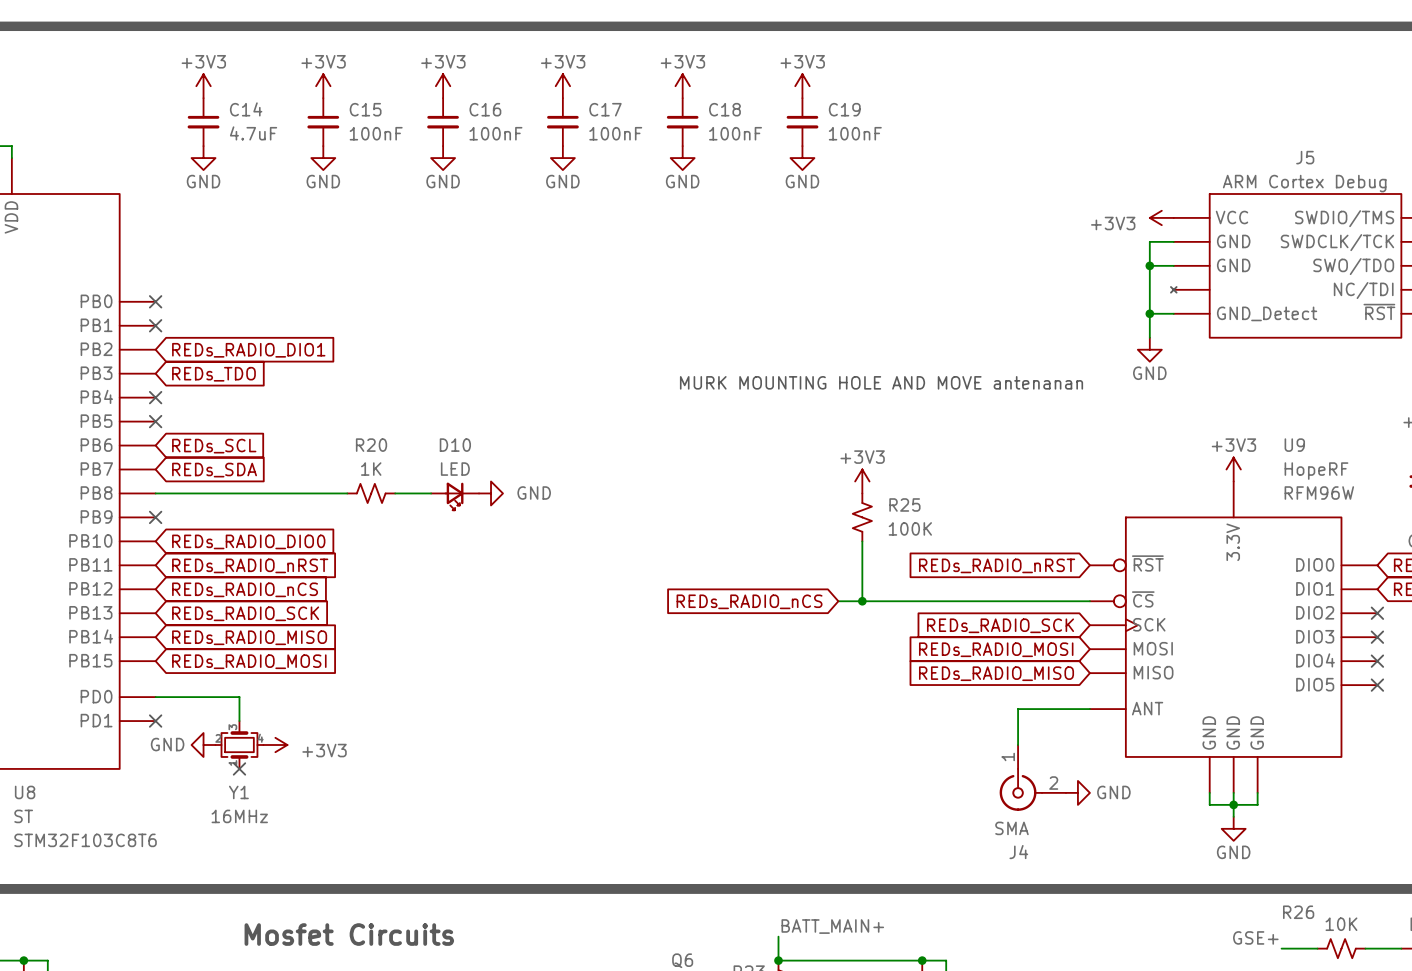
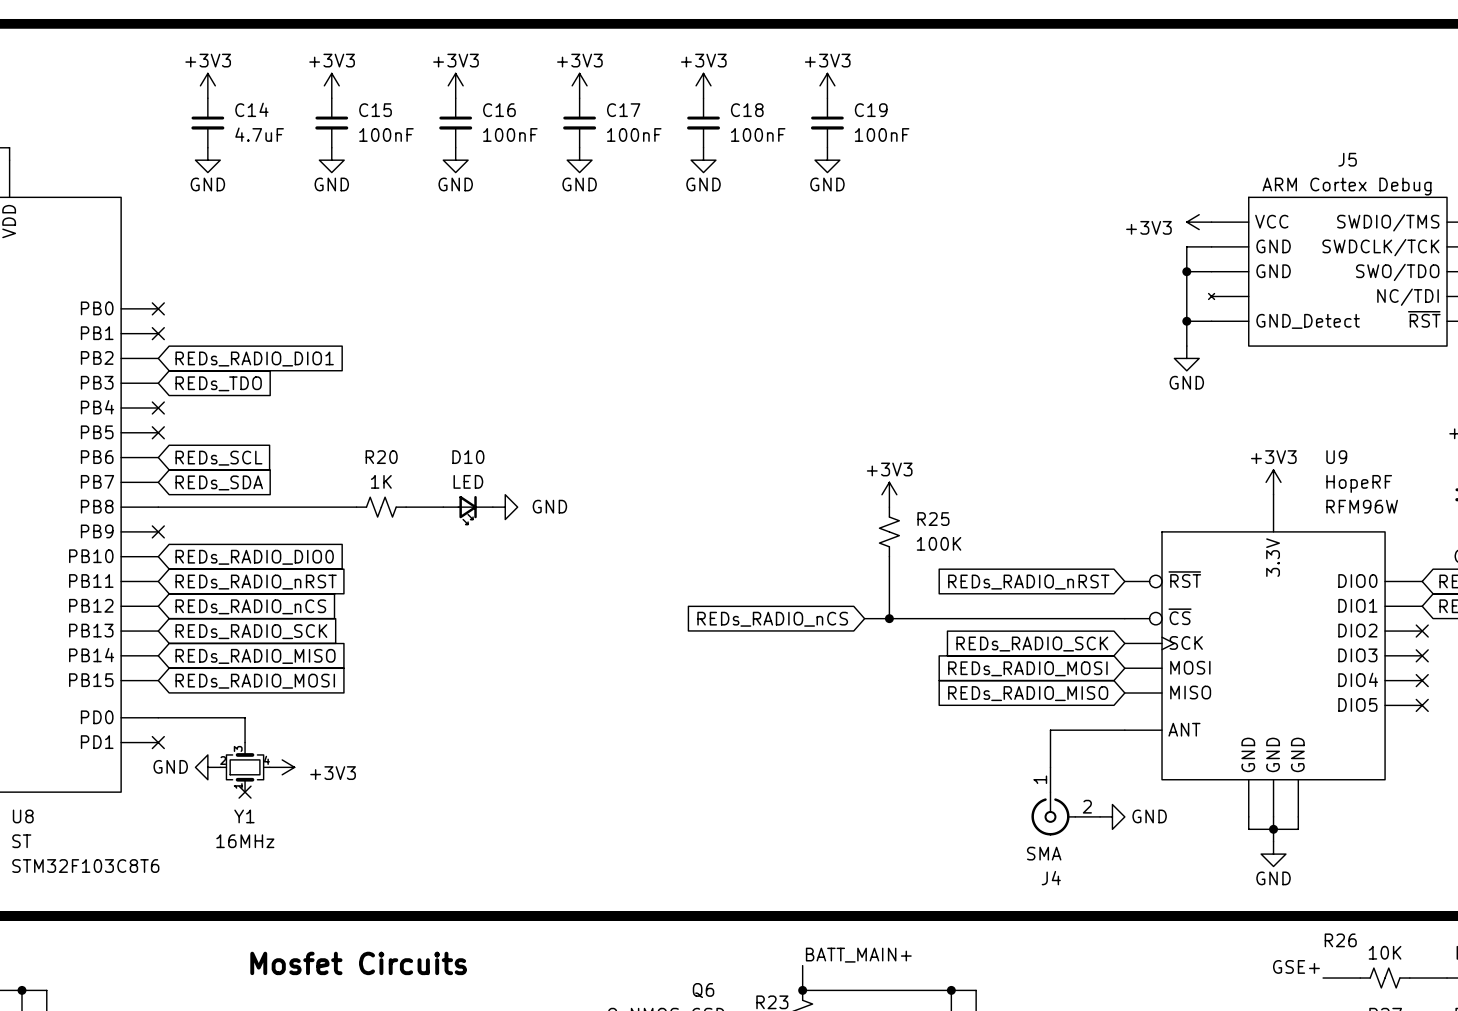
text: MURK MOUNTING HOLE AND MOVE antenanan (881, 382) -> none

